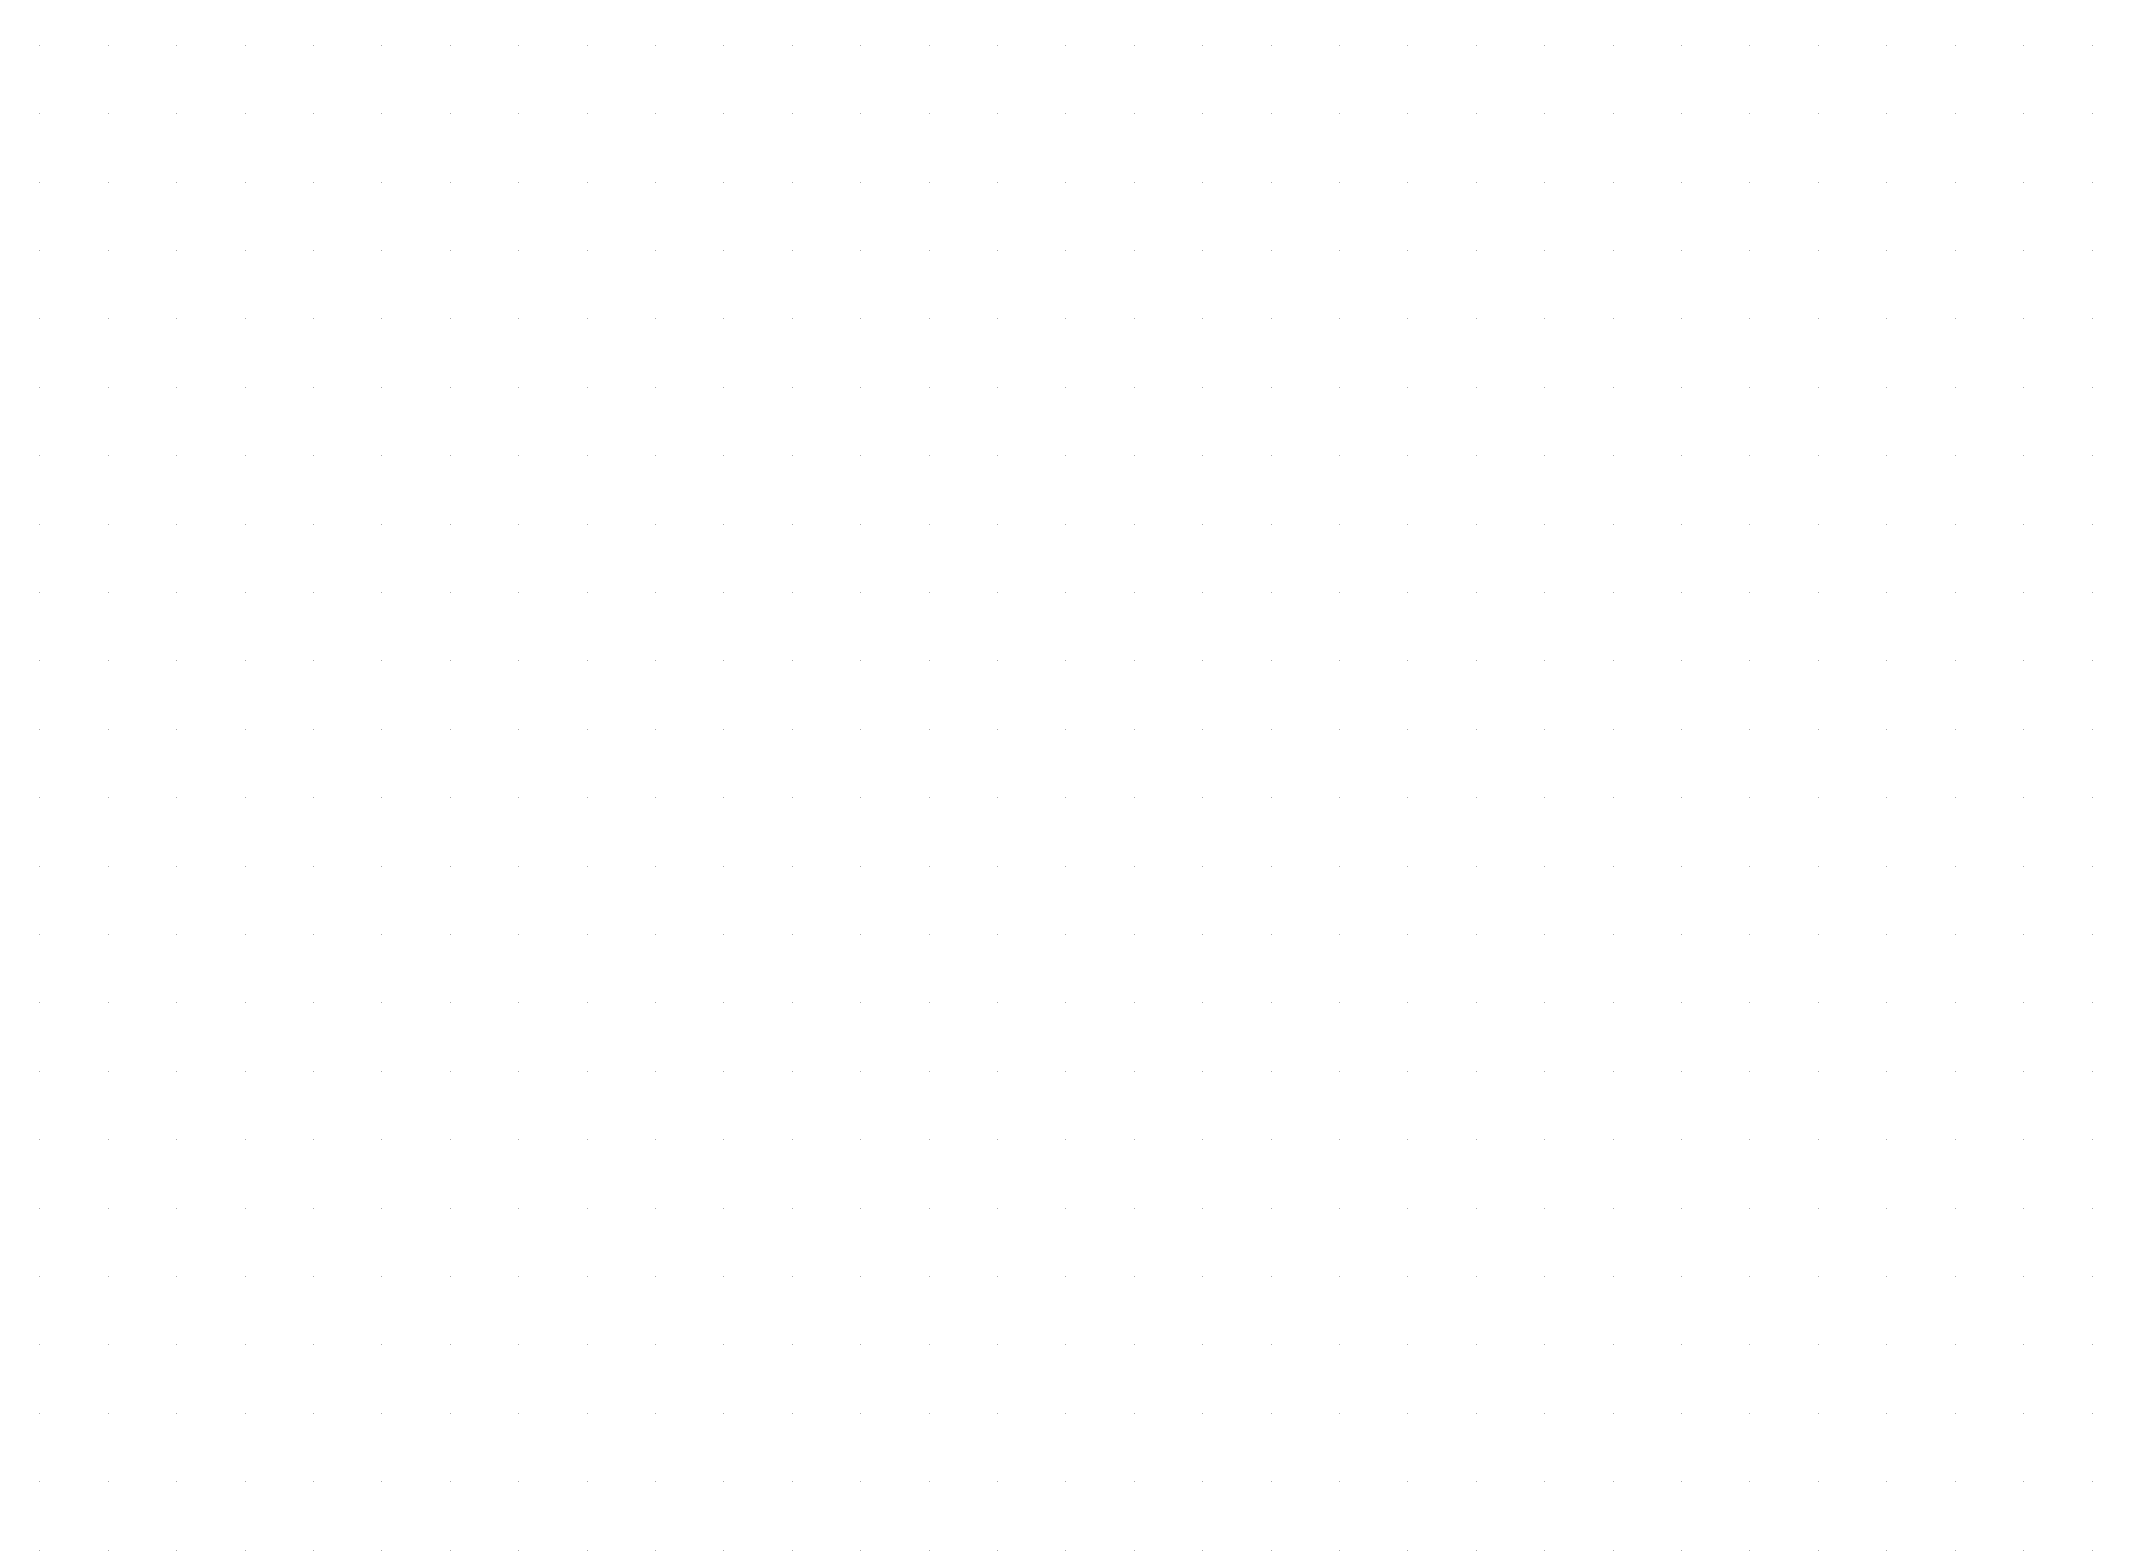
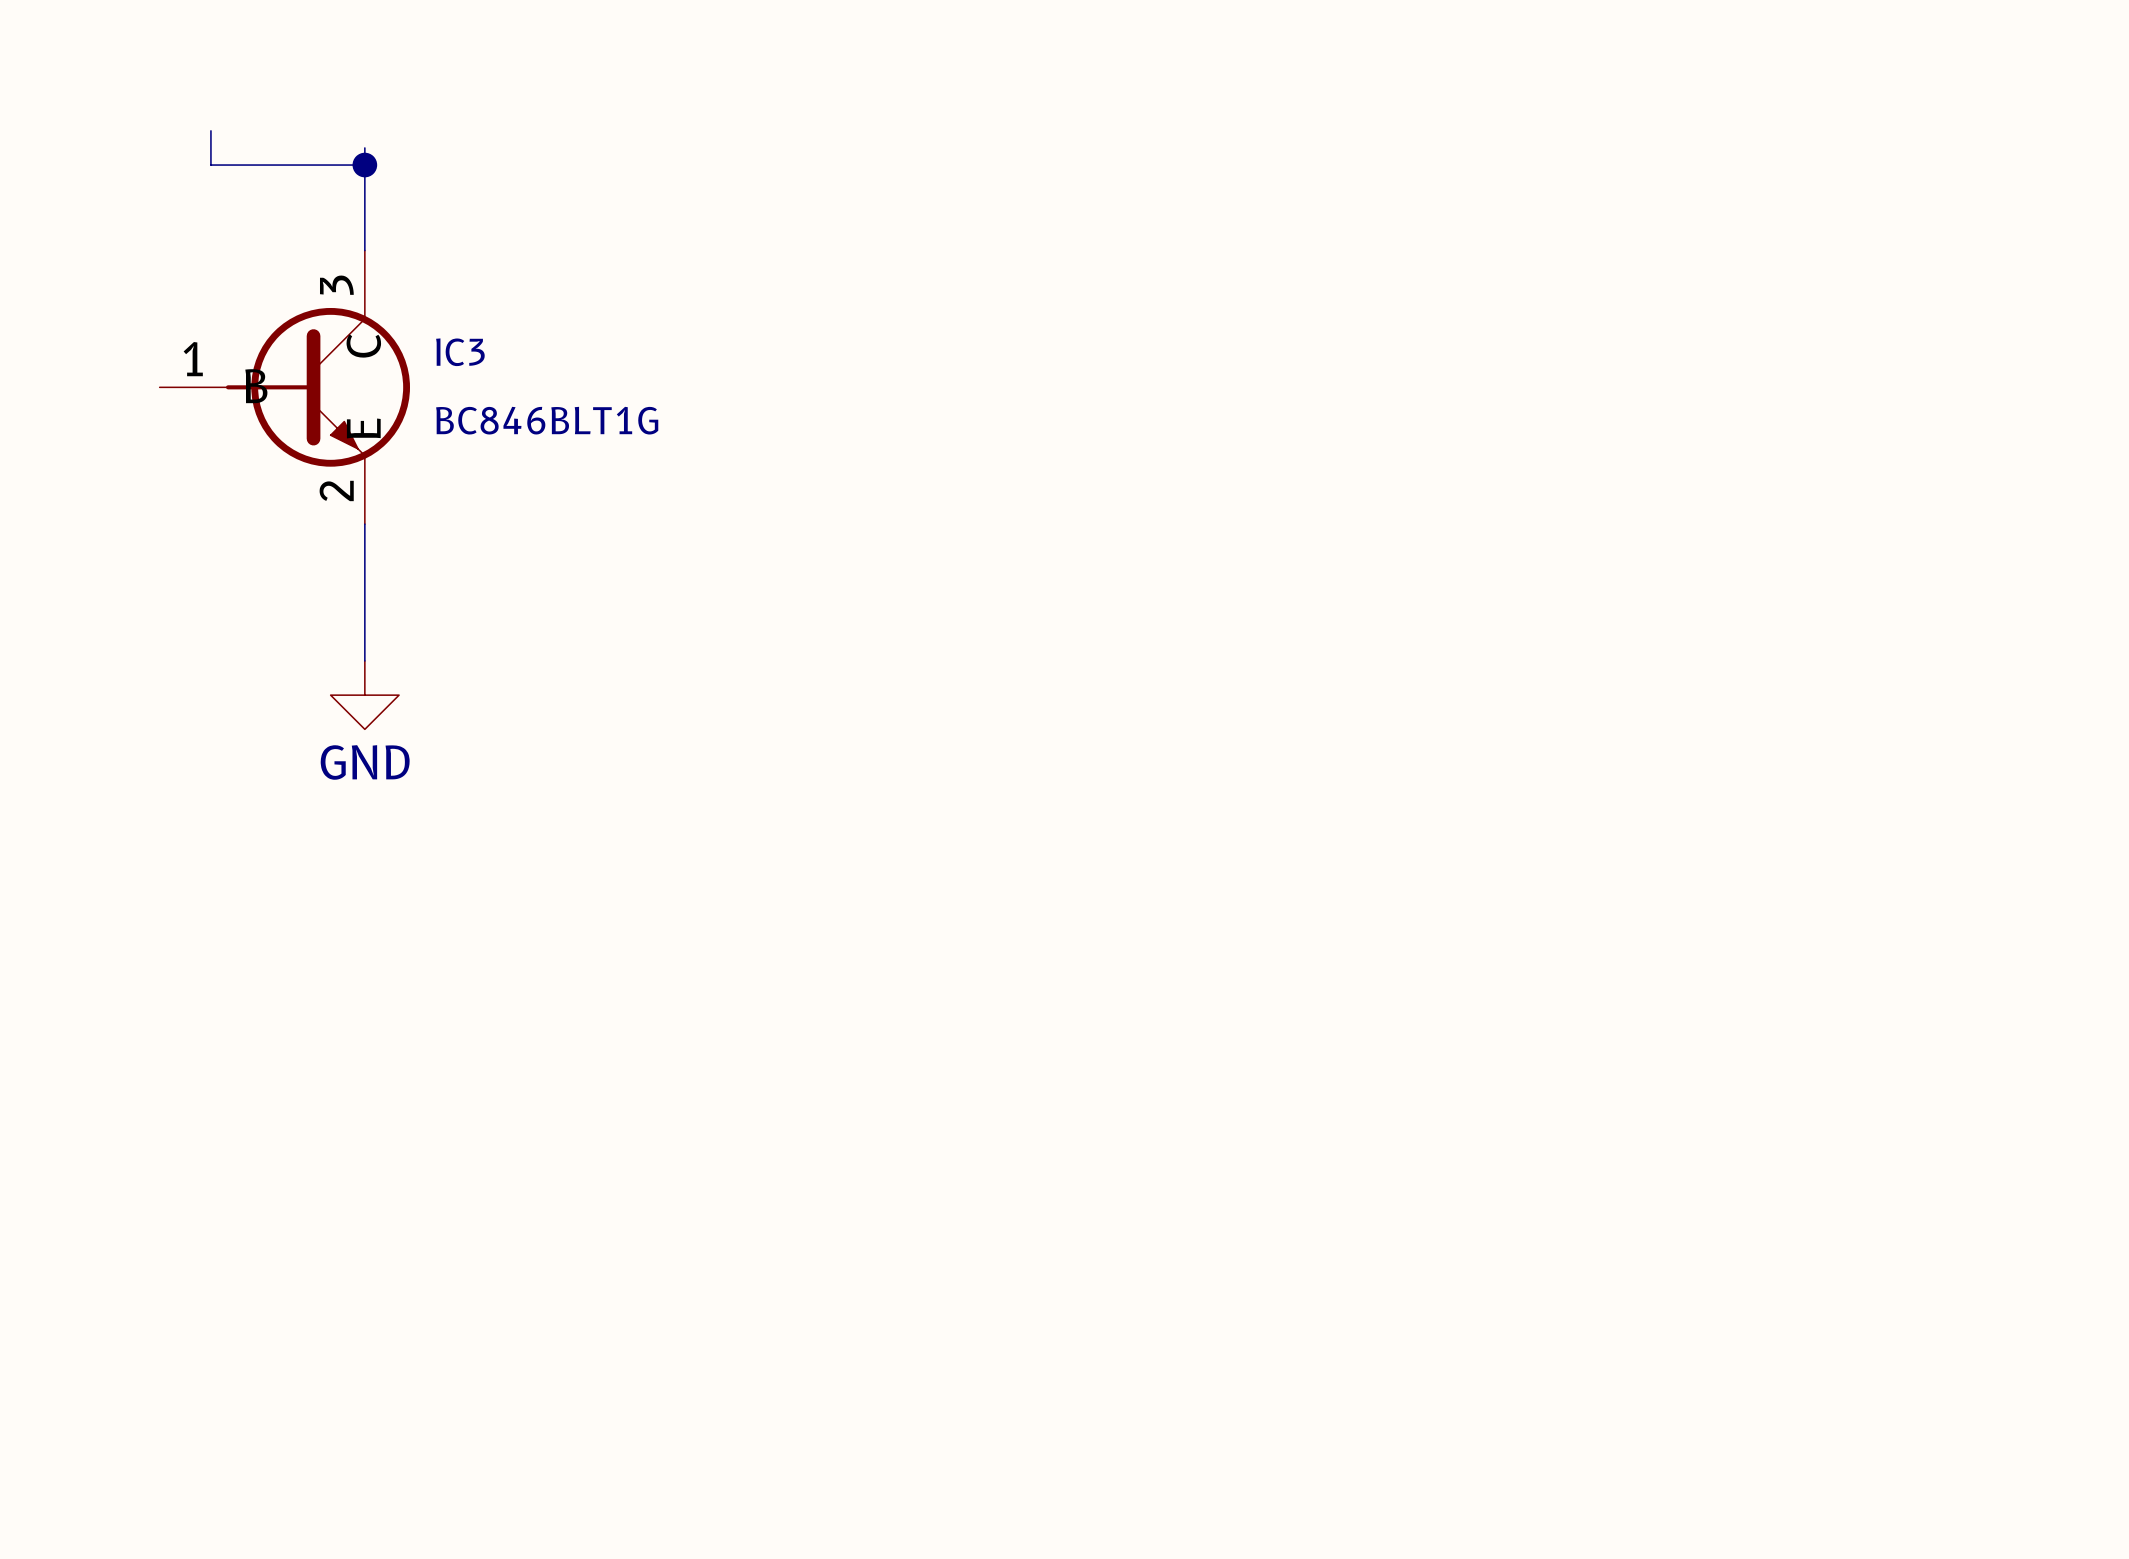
wire: none -> (210, 130) (210, 165) (364, 165)
wire: none -> (364, 147) (364, 250)
junction: none -> (364, 165)
IC3: none -> BC846BLT1G (284, 387)
wire: none -> (364, 524) (364, 660)
power symbol: none -> GND (364, 695)

